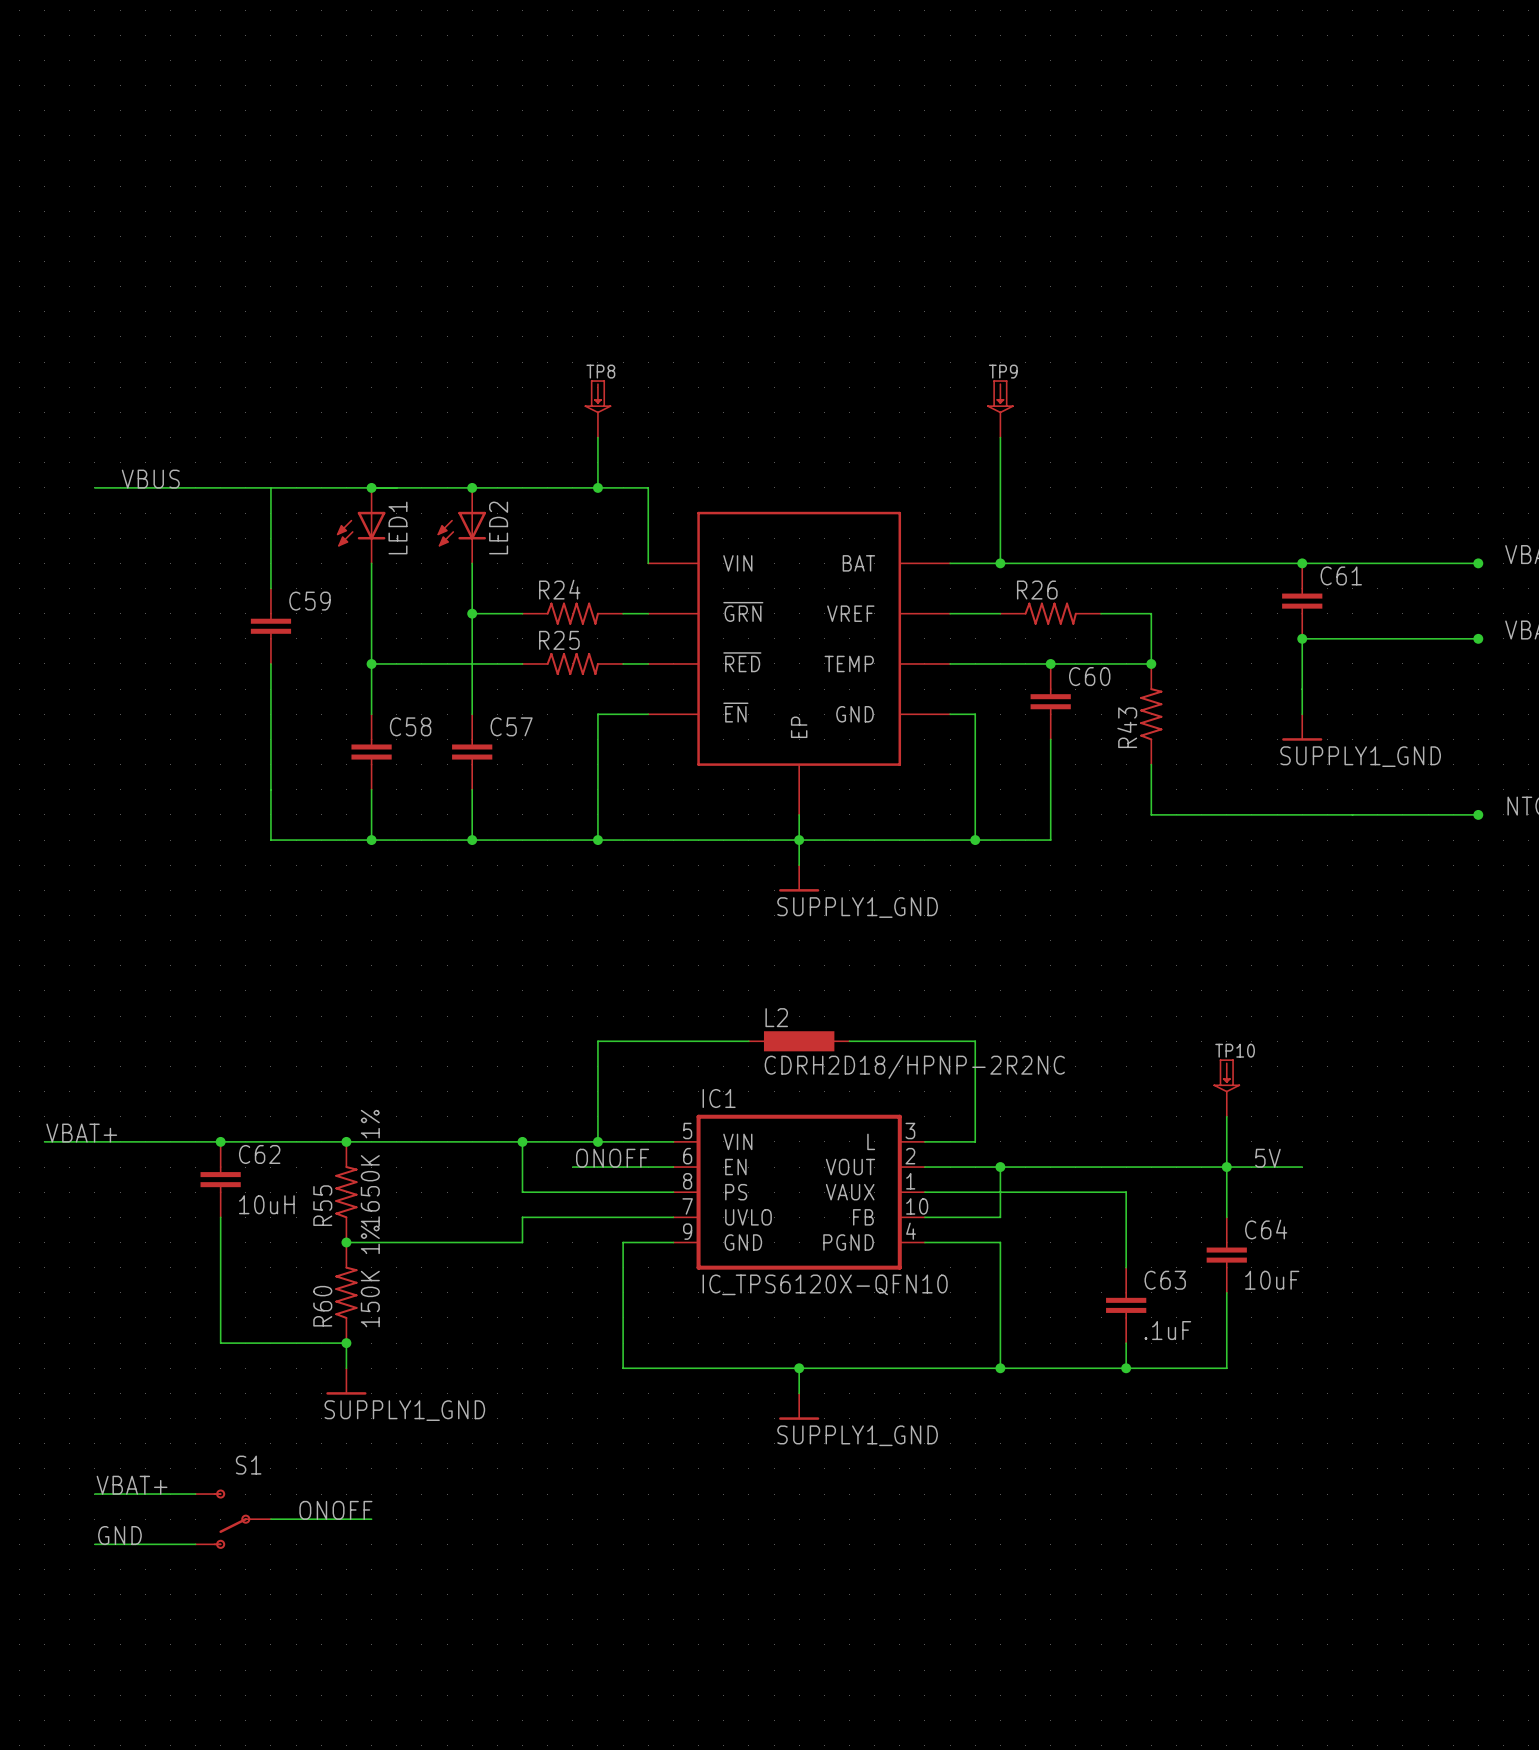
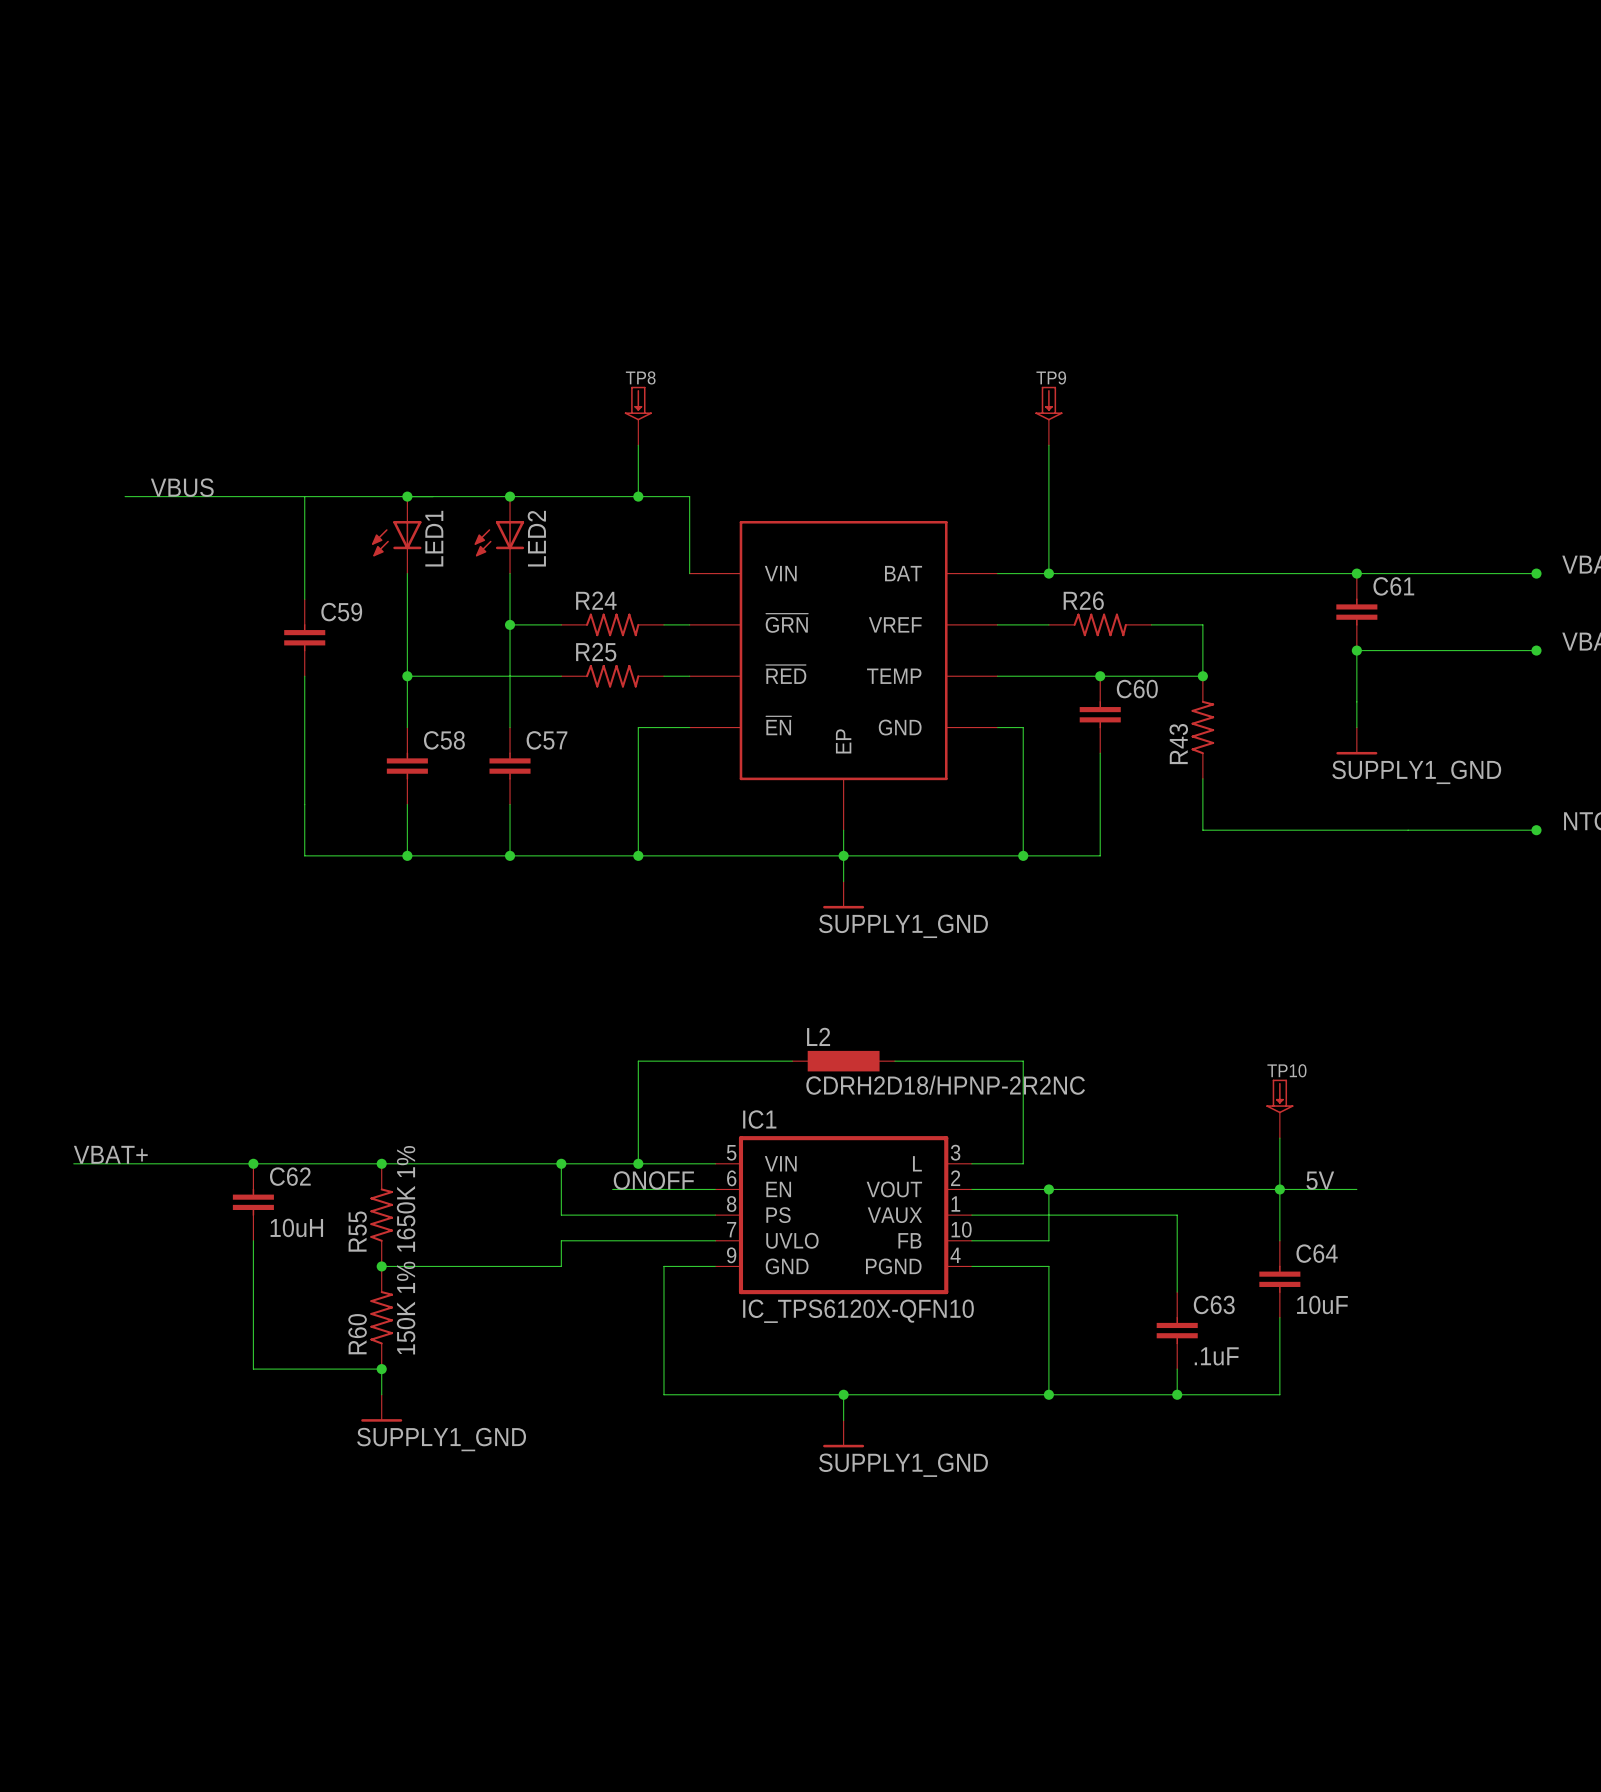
label: VBAT+ (132, 1485) -> none
wire: (94, 1494) (195, 1494) -> none
label: ONOFF (335, 1510) -> none
S1: (233, 1519) -> none
wire: (270, 1519) (371, 1519) -> none
label: GND (119, 1535) -> none
wire: (94, 1544) (195, 1544) -> none

